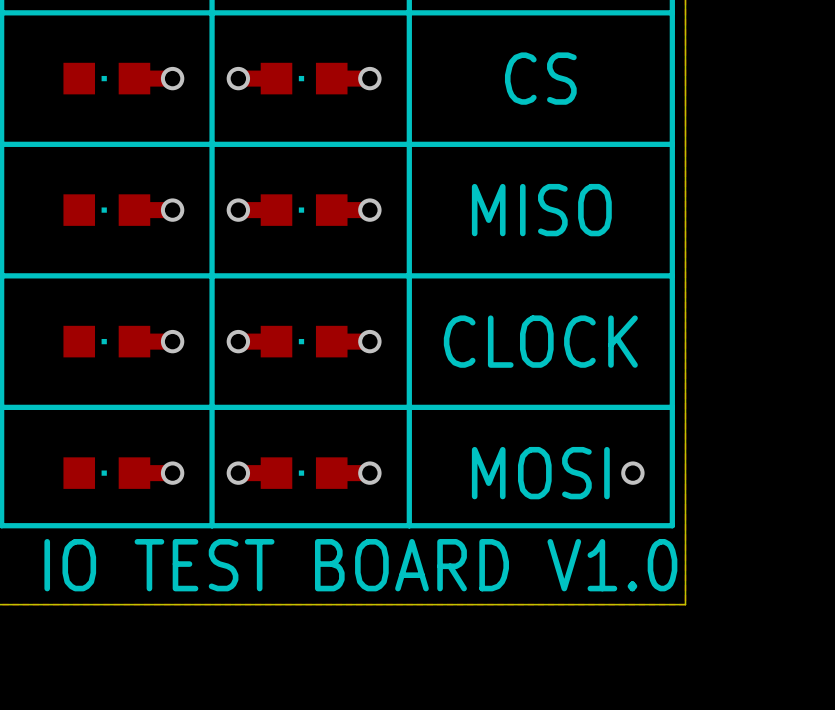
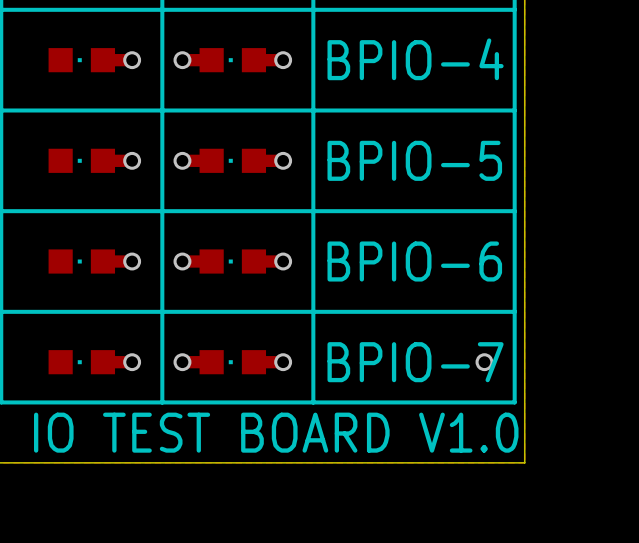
text: CS (540, 78) -> BPIO-4 (415, 59)
text: MISO (541, 210) -> BPIO-5 (414, 160)
text: CLOCK (540, 341) -> BPIO-6 (414, 261)
text: MOSI (540, 473) -> BPIO-7 (415, 362)

